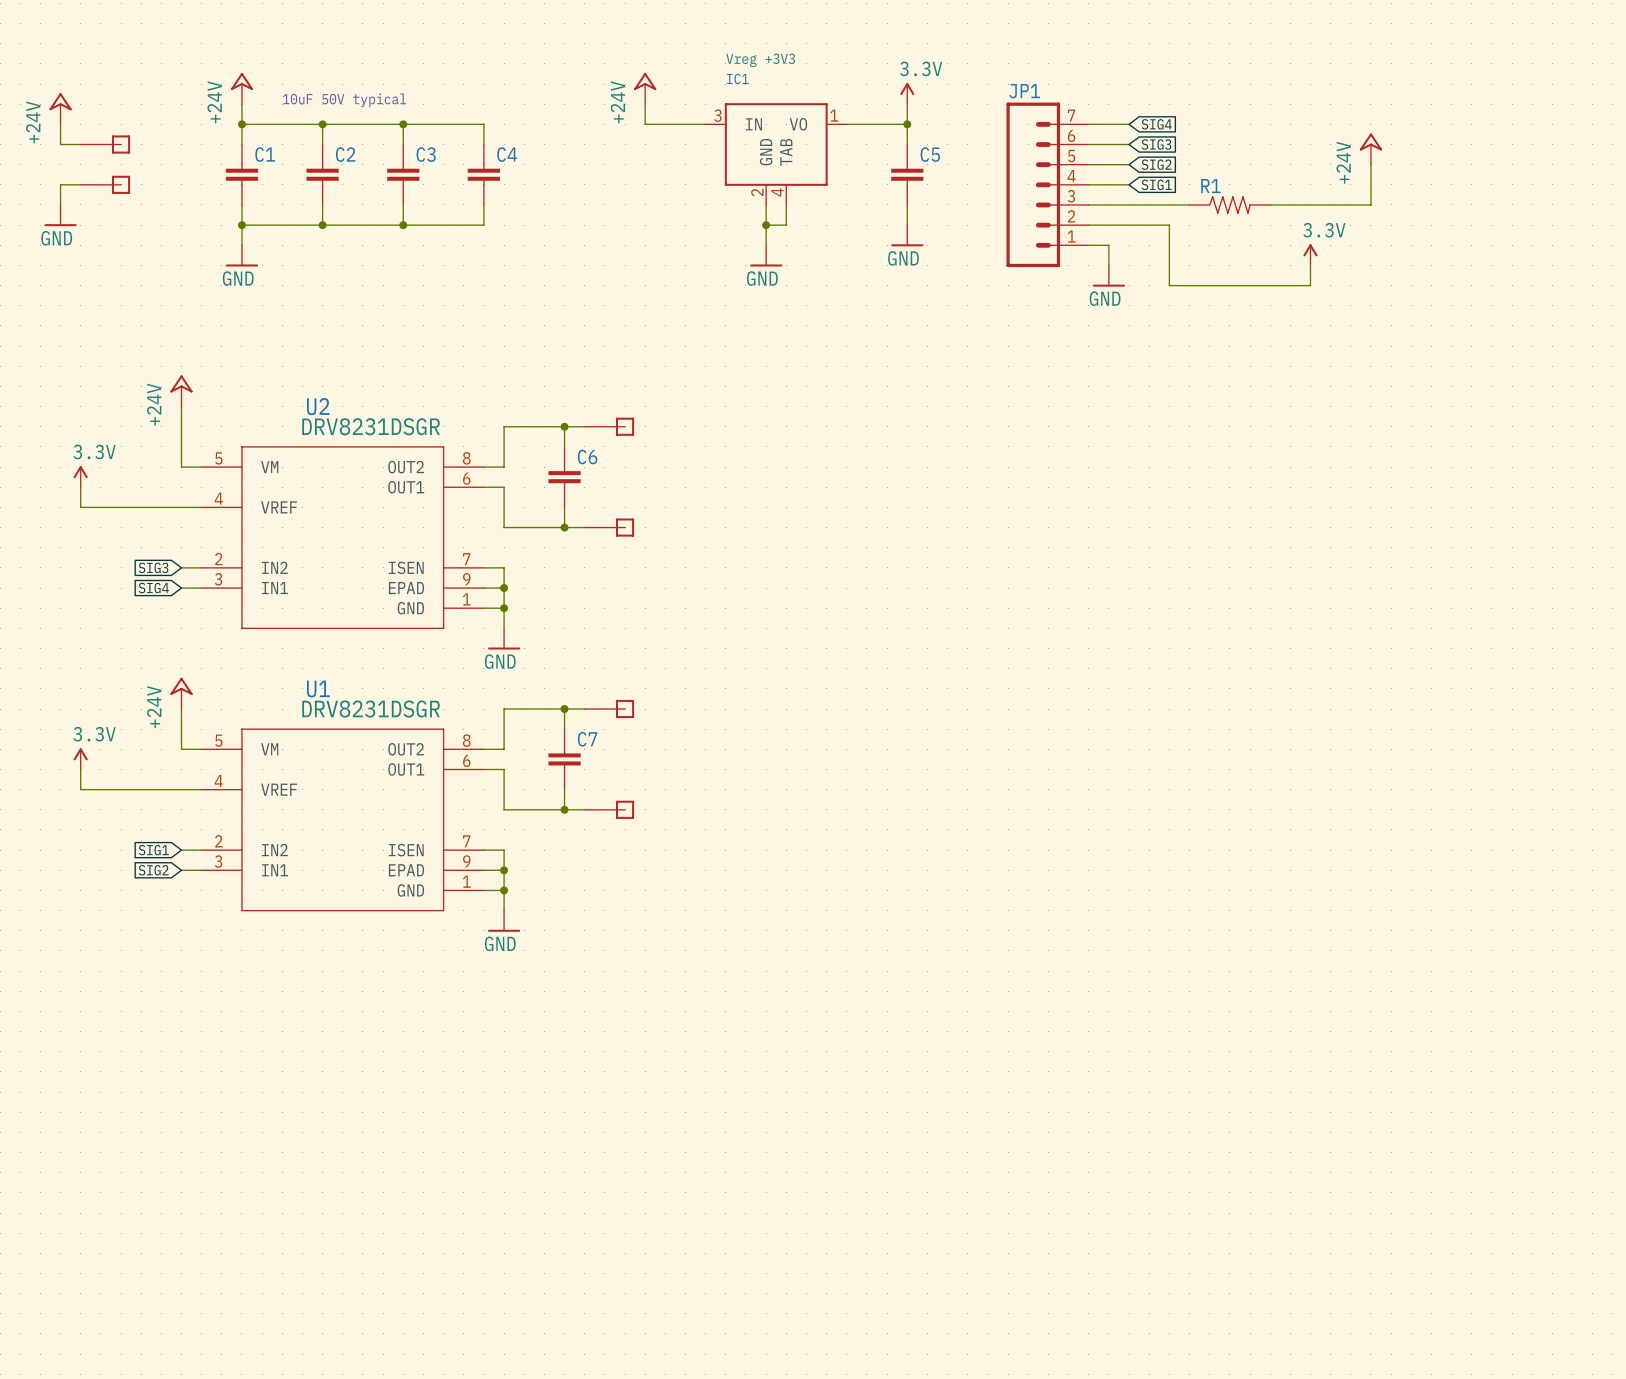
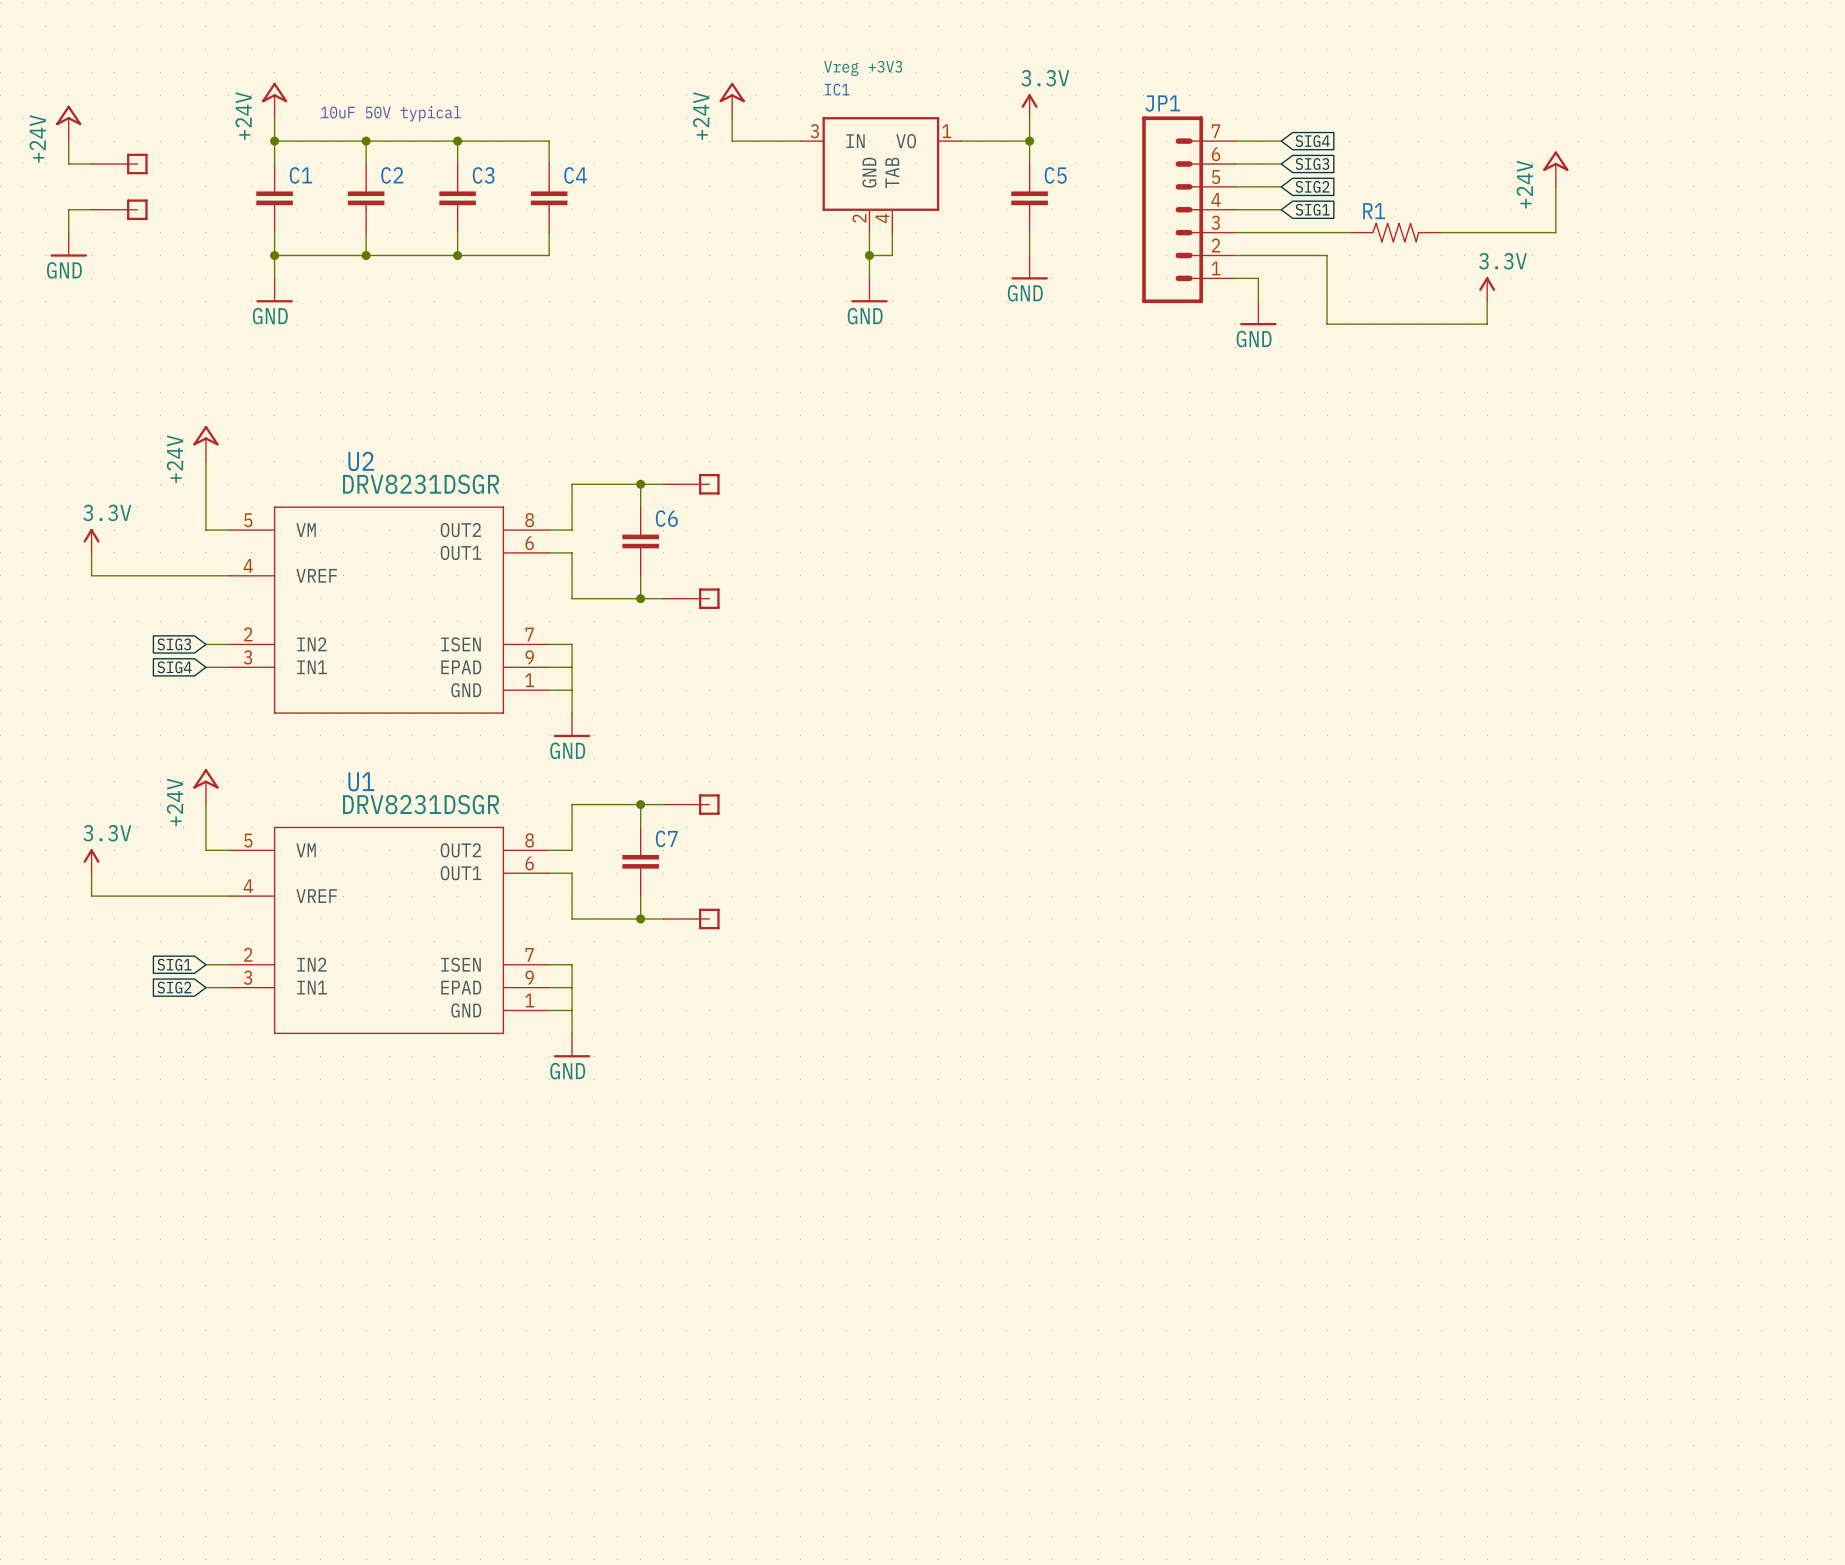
junction: (504, 588) -> none
junction: (504, 608) -> none
junction: (504, 870) -> none
junction: (504, 890) -> none

